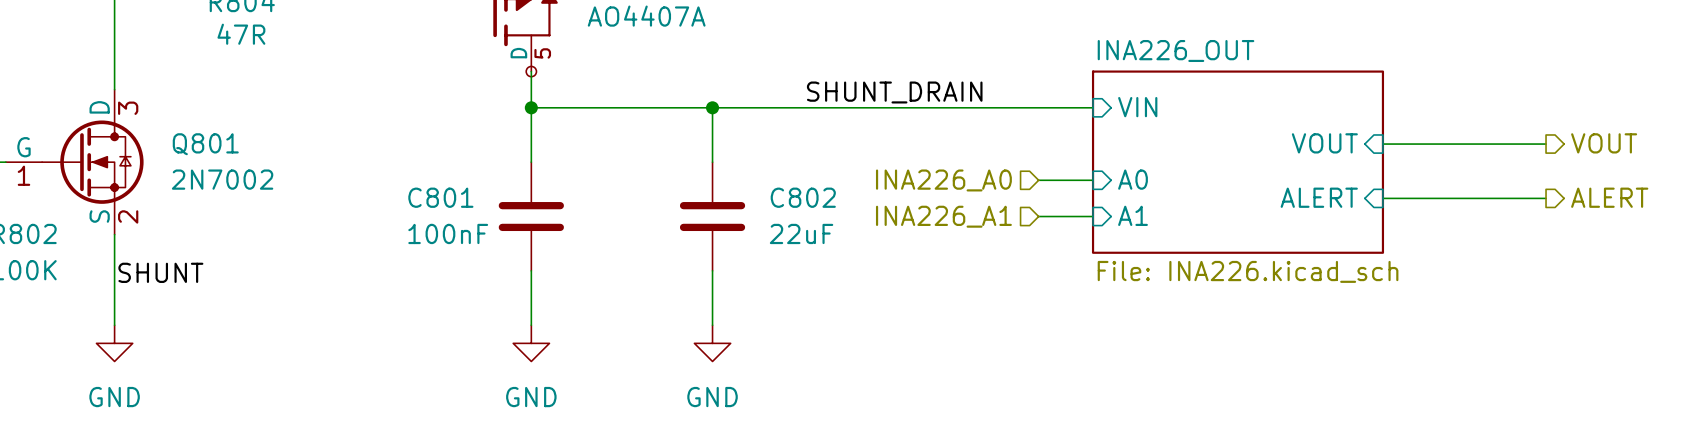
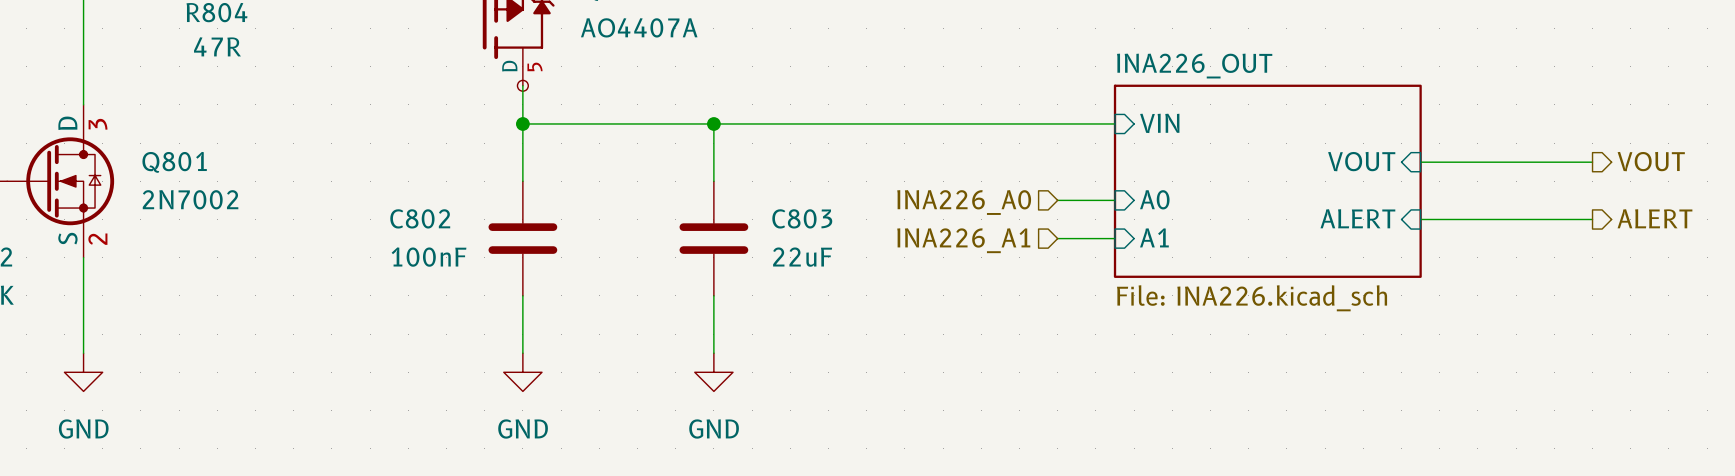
label: SHUNT_DRAIN (894, 92) -> none
C801 name: C801 (440, 197) -> C802 (420, 218)
C802 name: C802 (803, 197) -> C803 (802, 218)
label: SHUNT (160, 272) -> none

